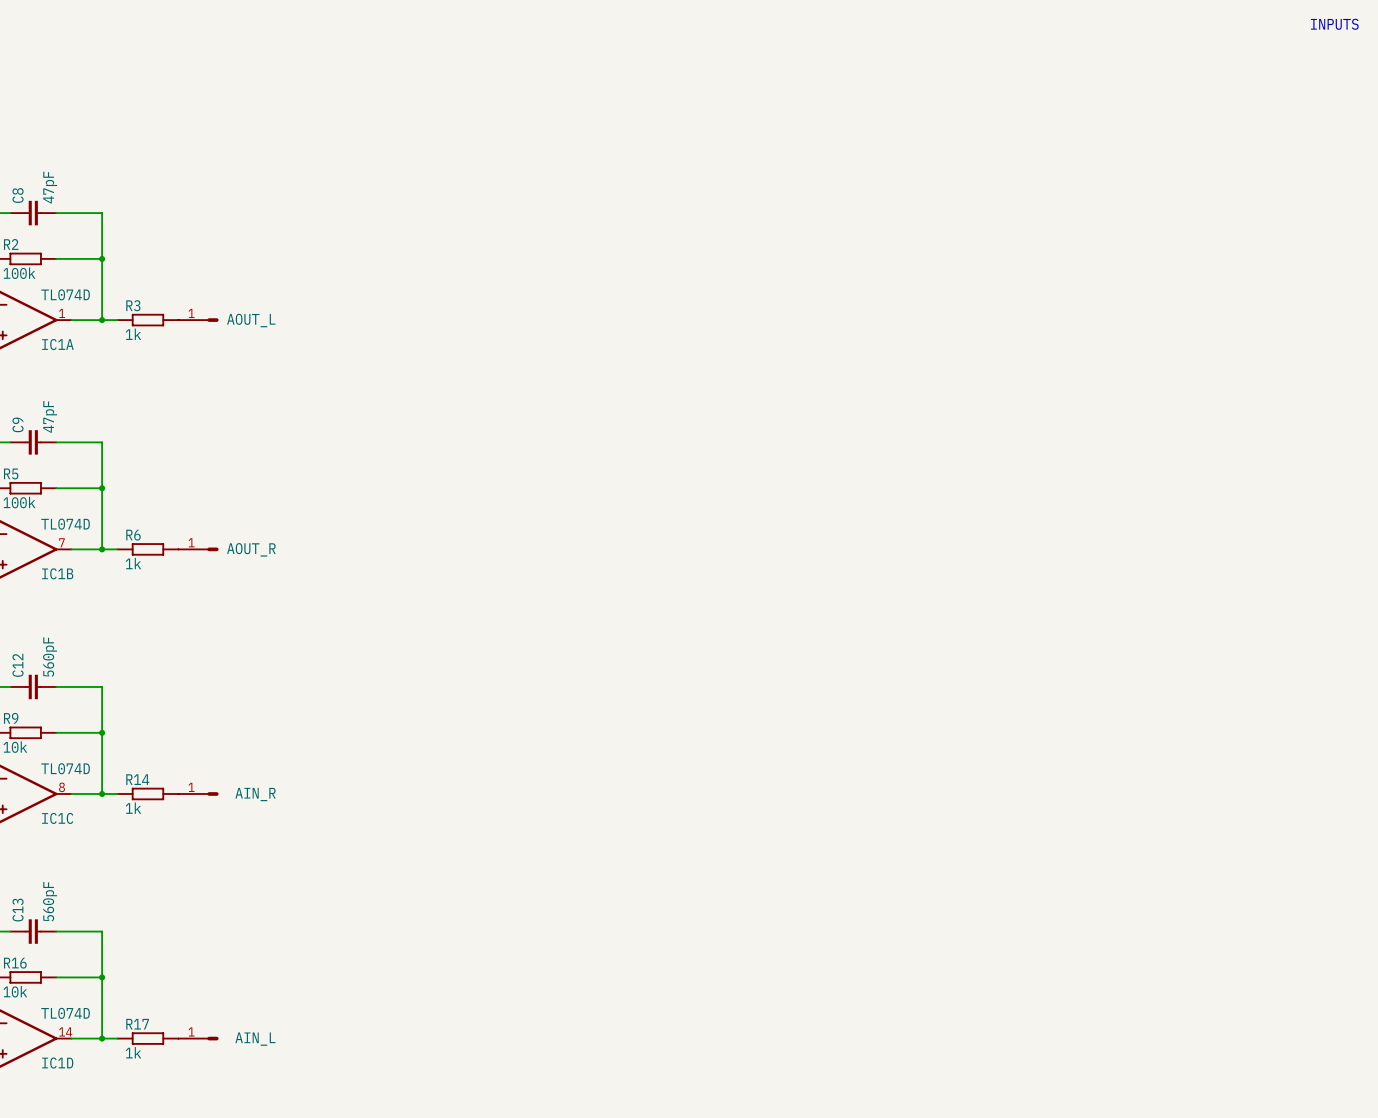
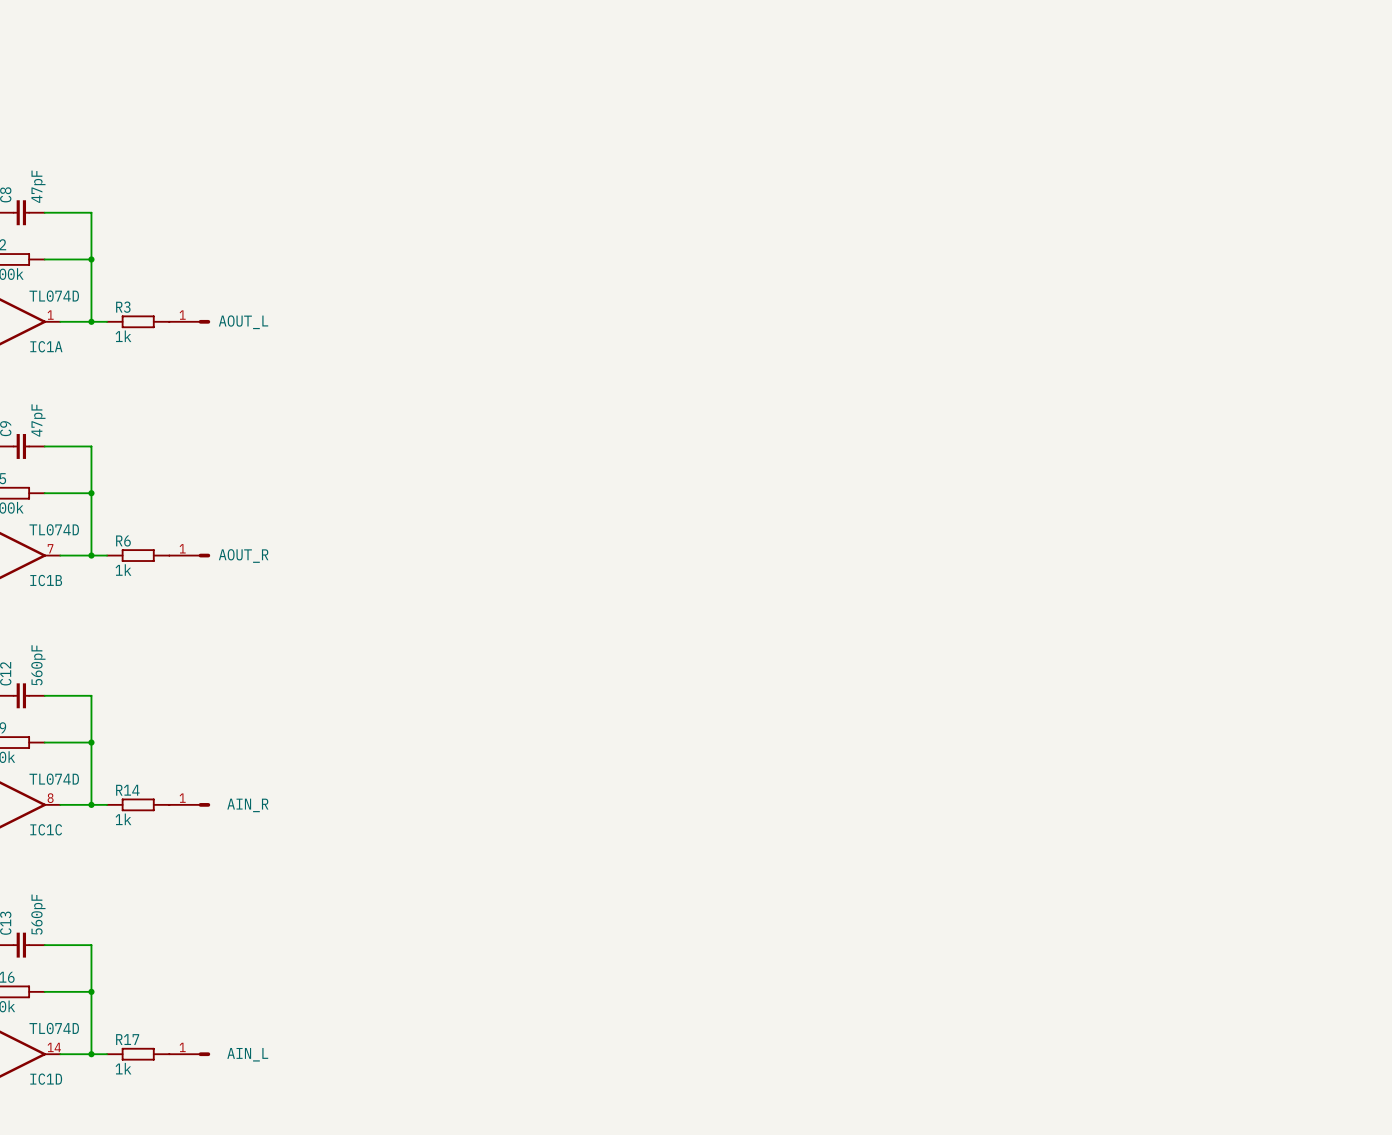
text: INPUTS (1334, 24) -> none

